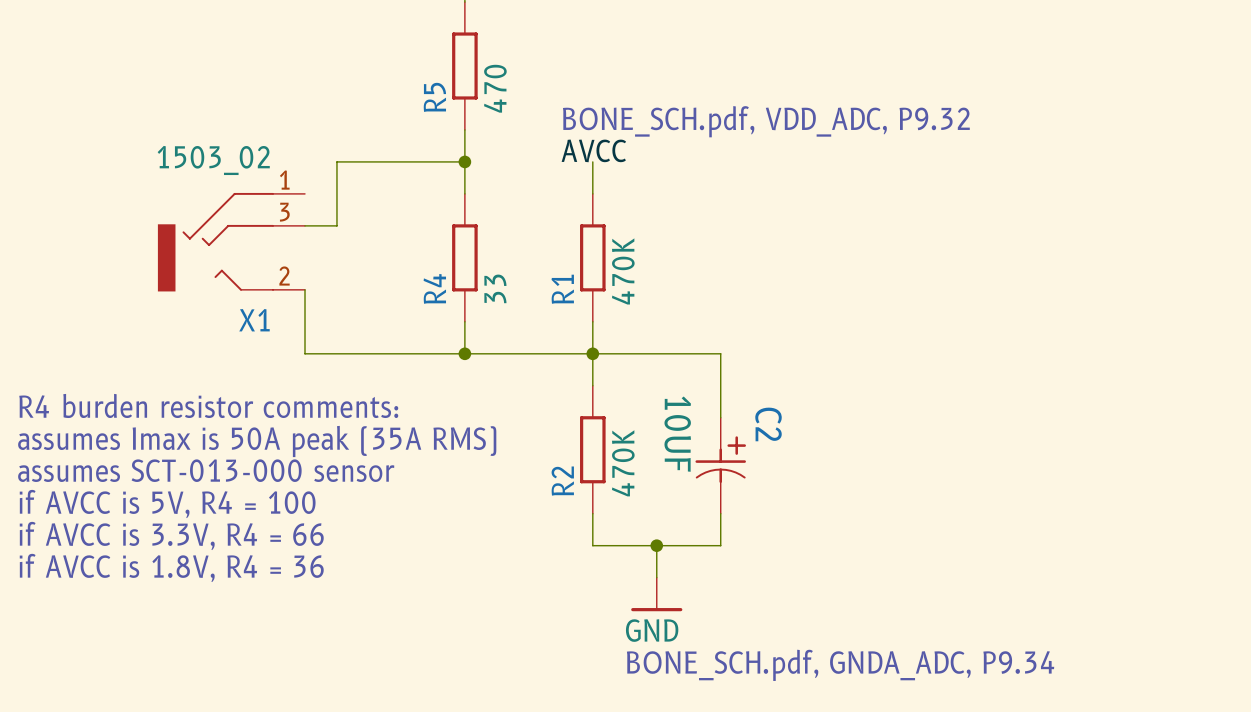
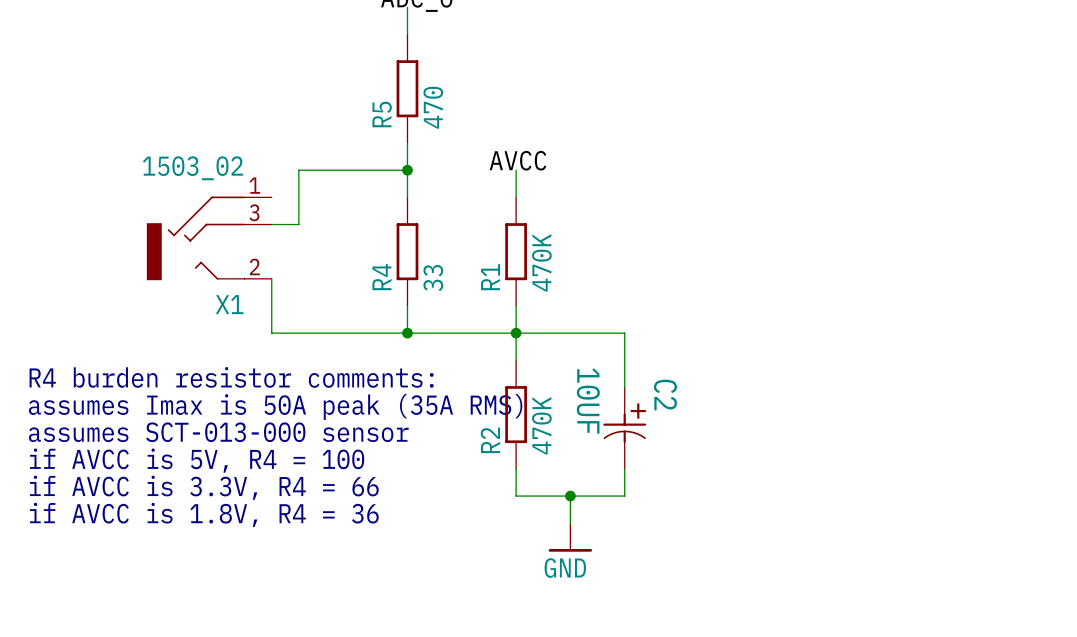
text: BONE_SCH.pdf, VDD_ADC, P9.32 (766, 121) -> none
text: BONE_SCH.pdf, GNDA_ADC, P9.34 (840, 665) -> none

